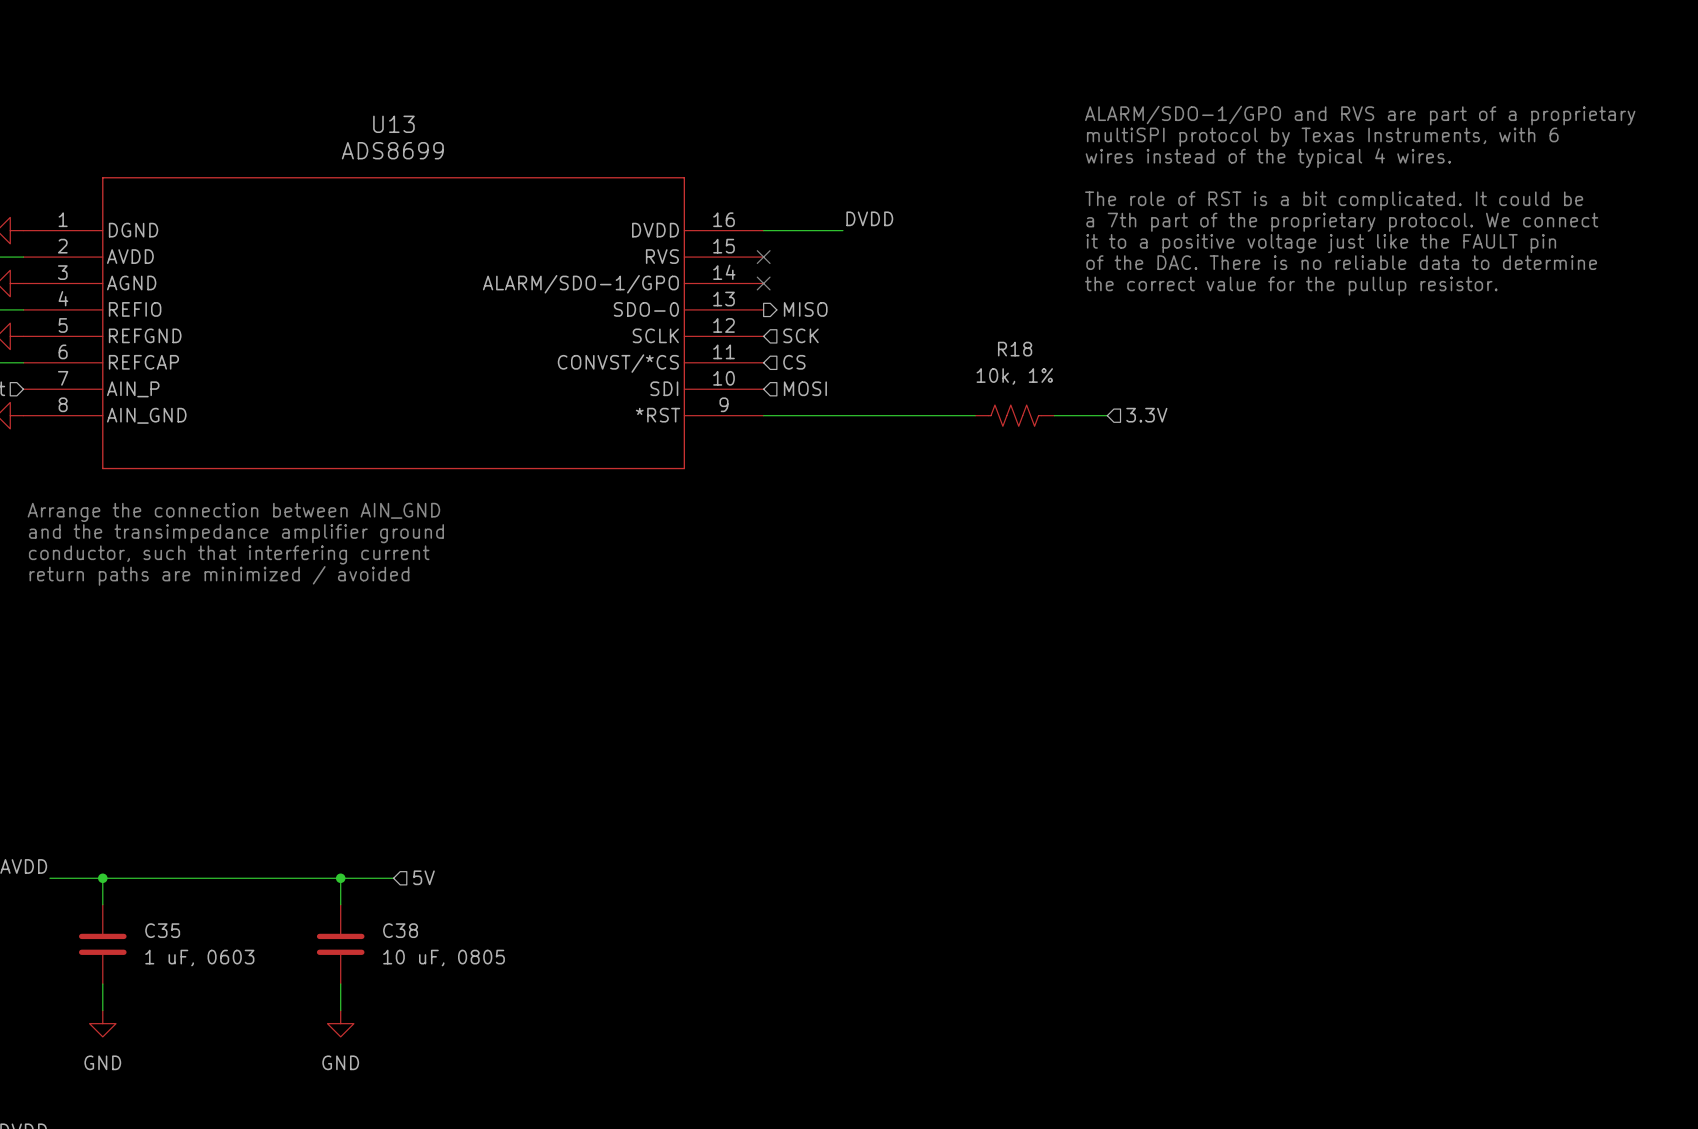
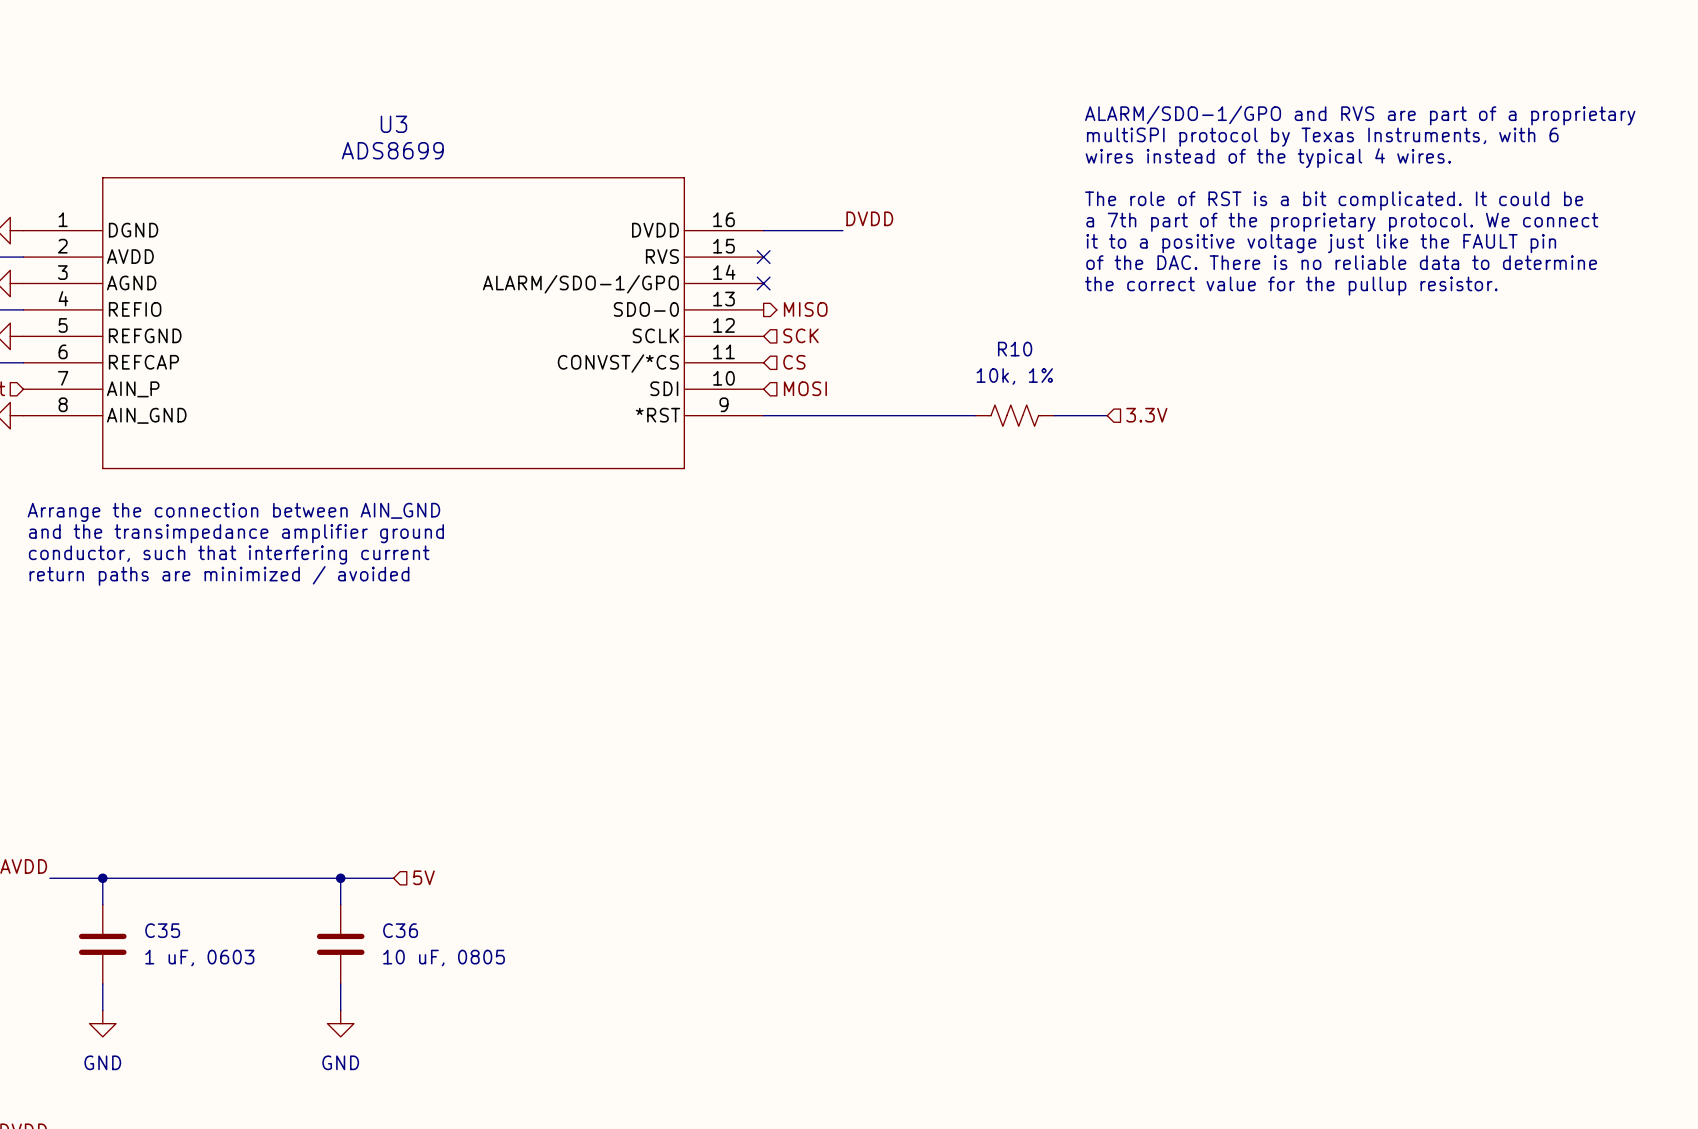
U13 name: U13 (393, 124) -> U3 (393, 124)
R18 name: R18 (1015, 349) -> R10 (1015, 349)
C38 name: C38 (400, 930) -> C36 (400, 930)

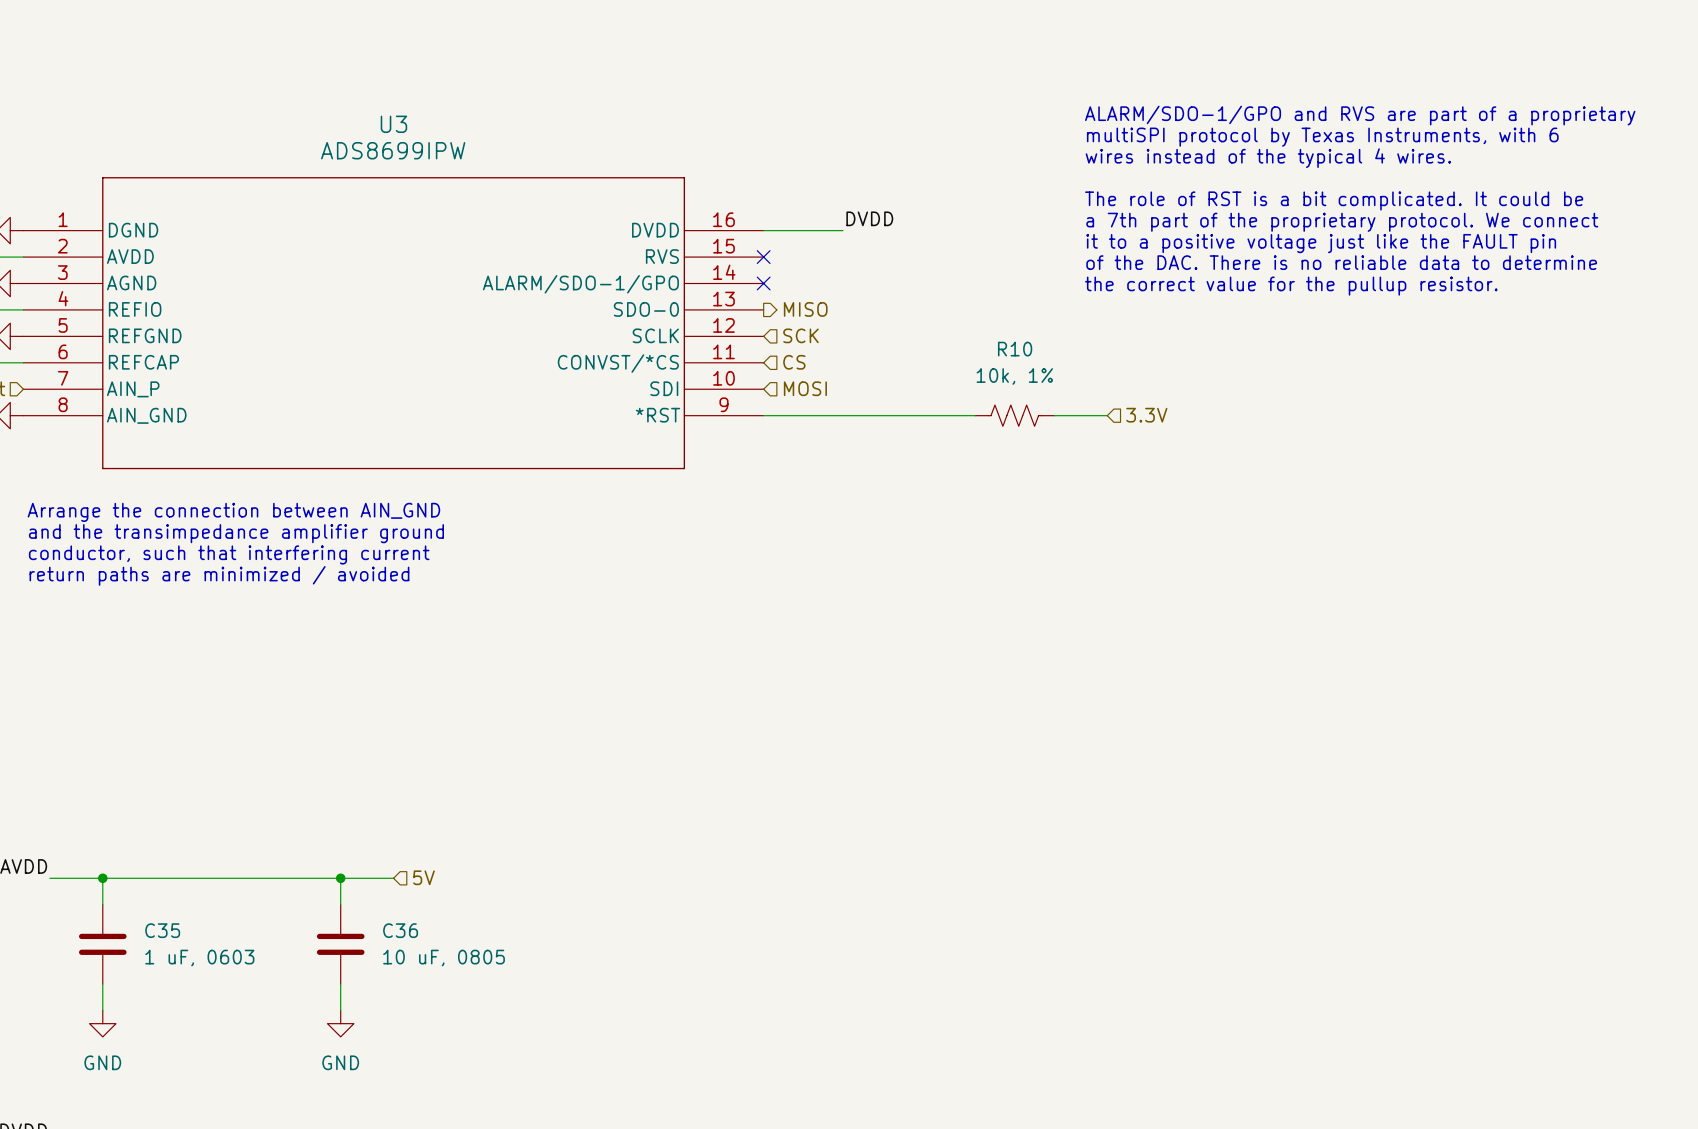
U3 value: ADS8699 (392, 150) -> ADS8699IPW (393, 150)

